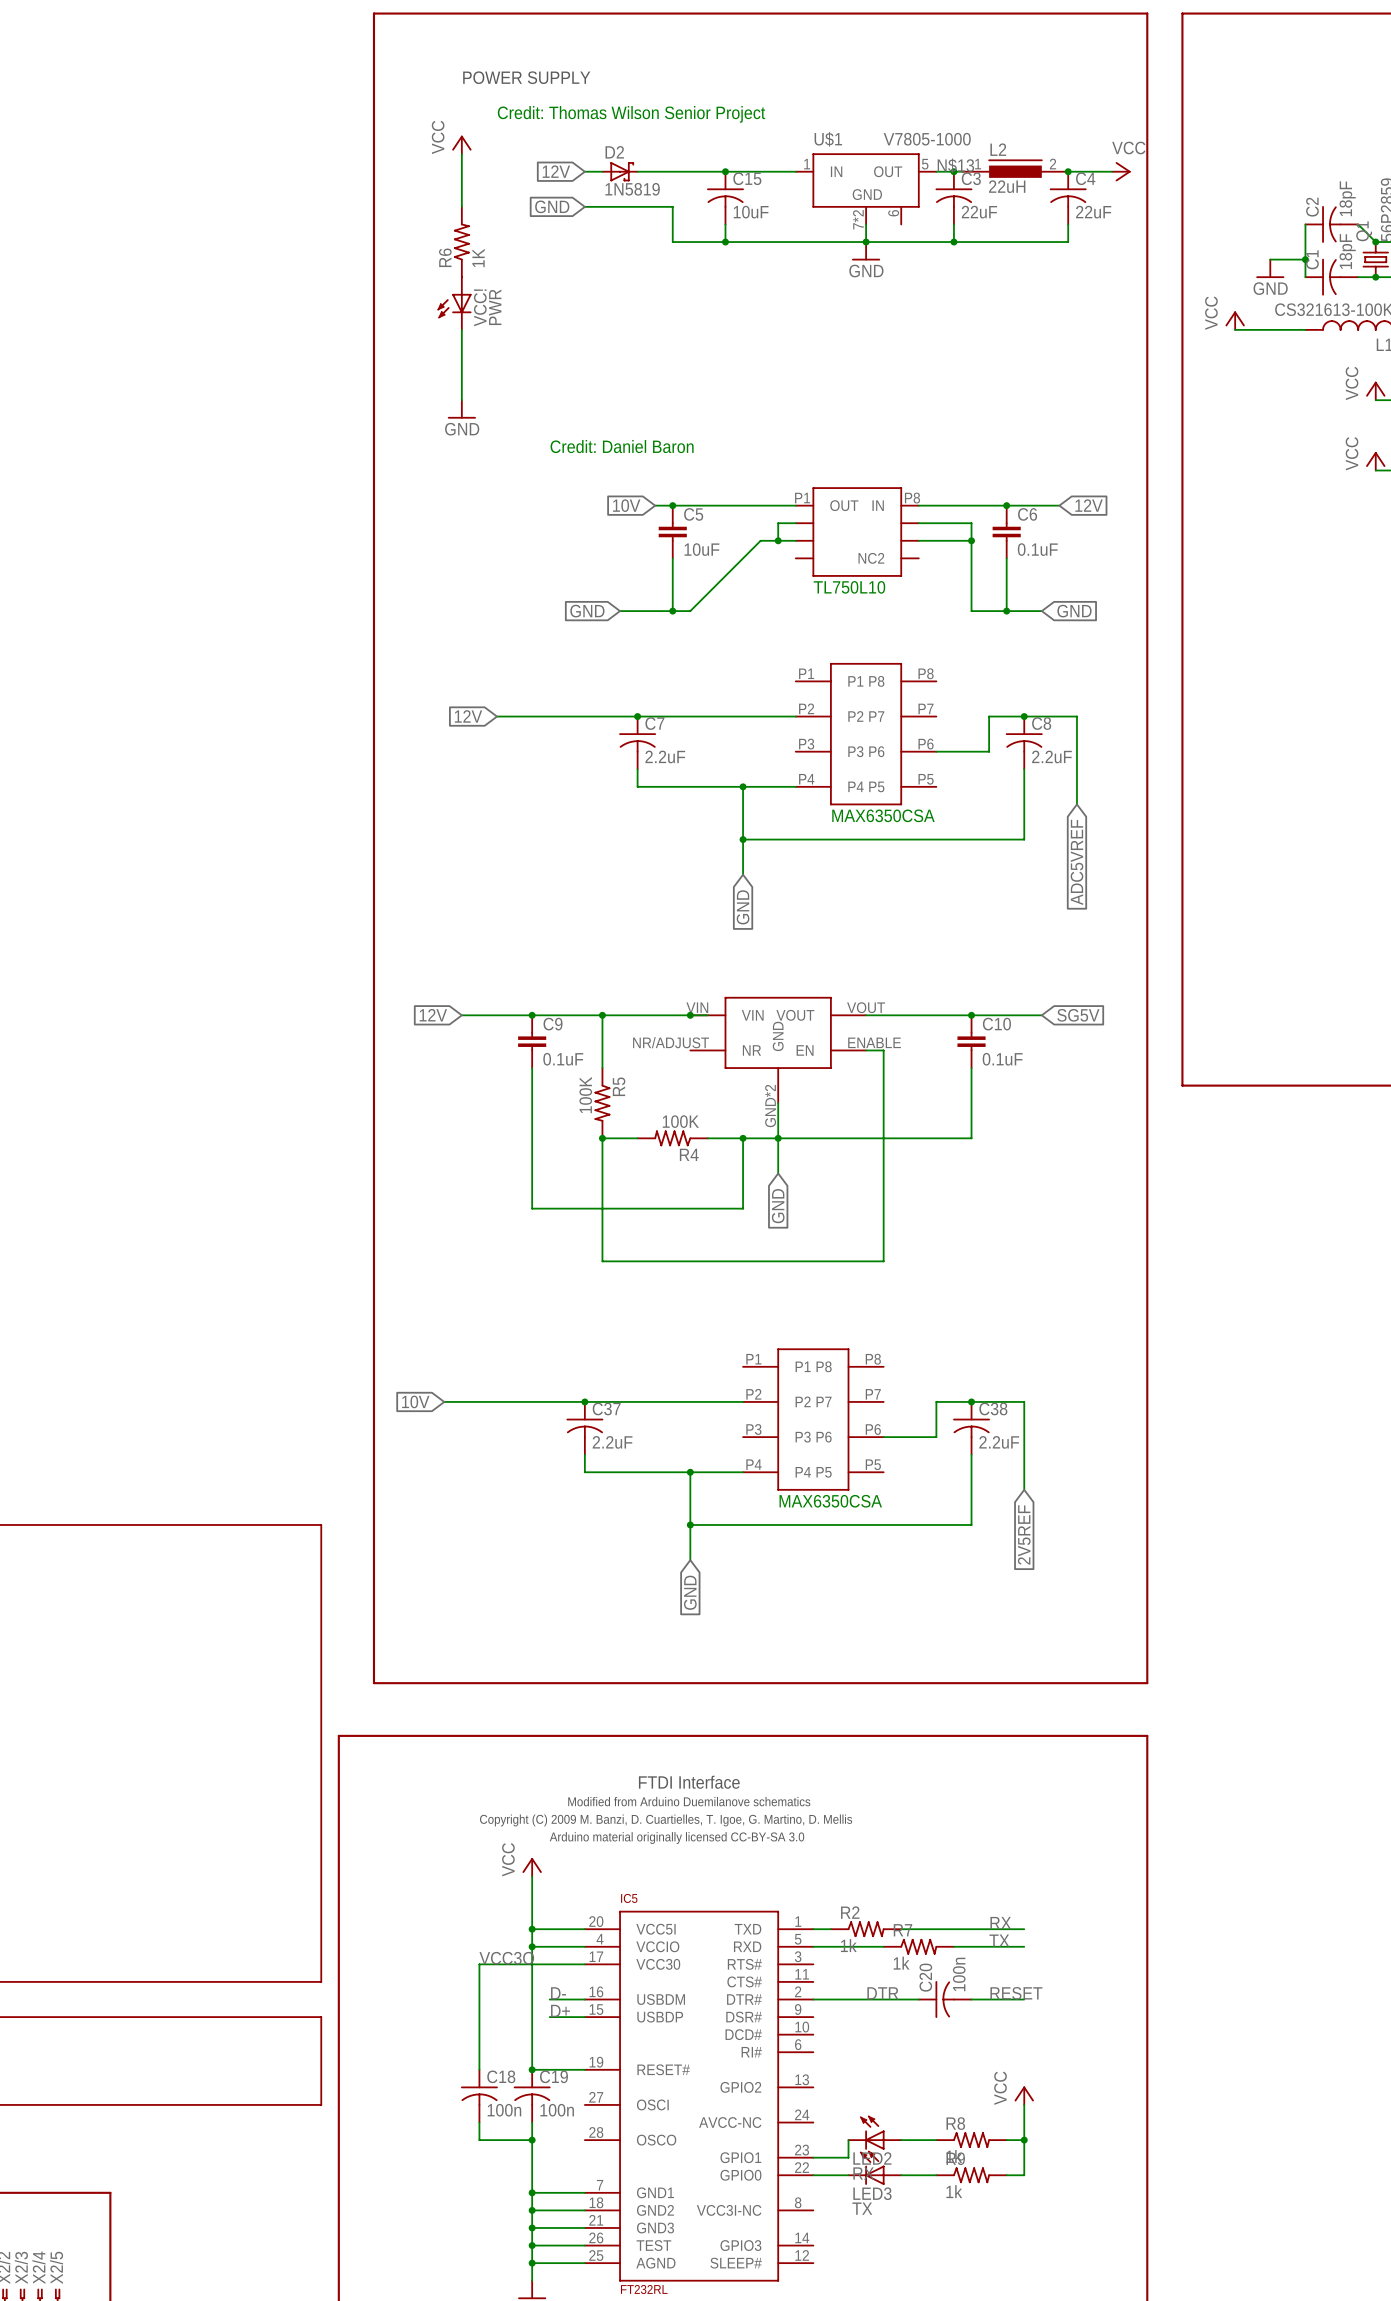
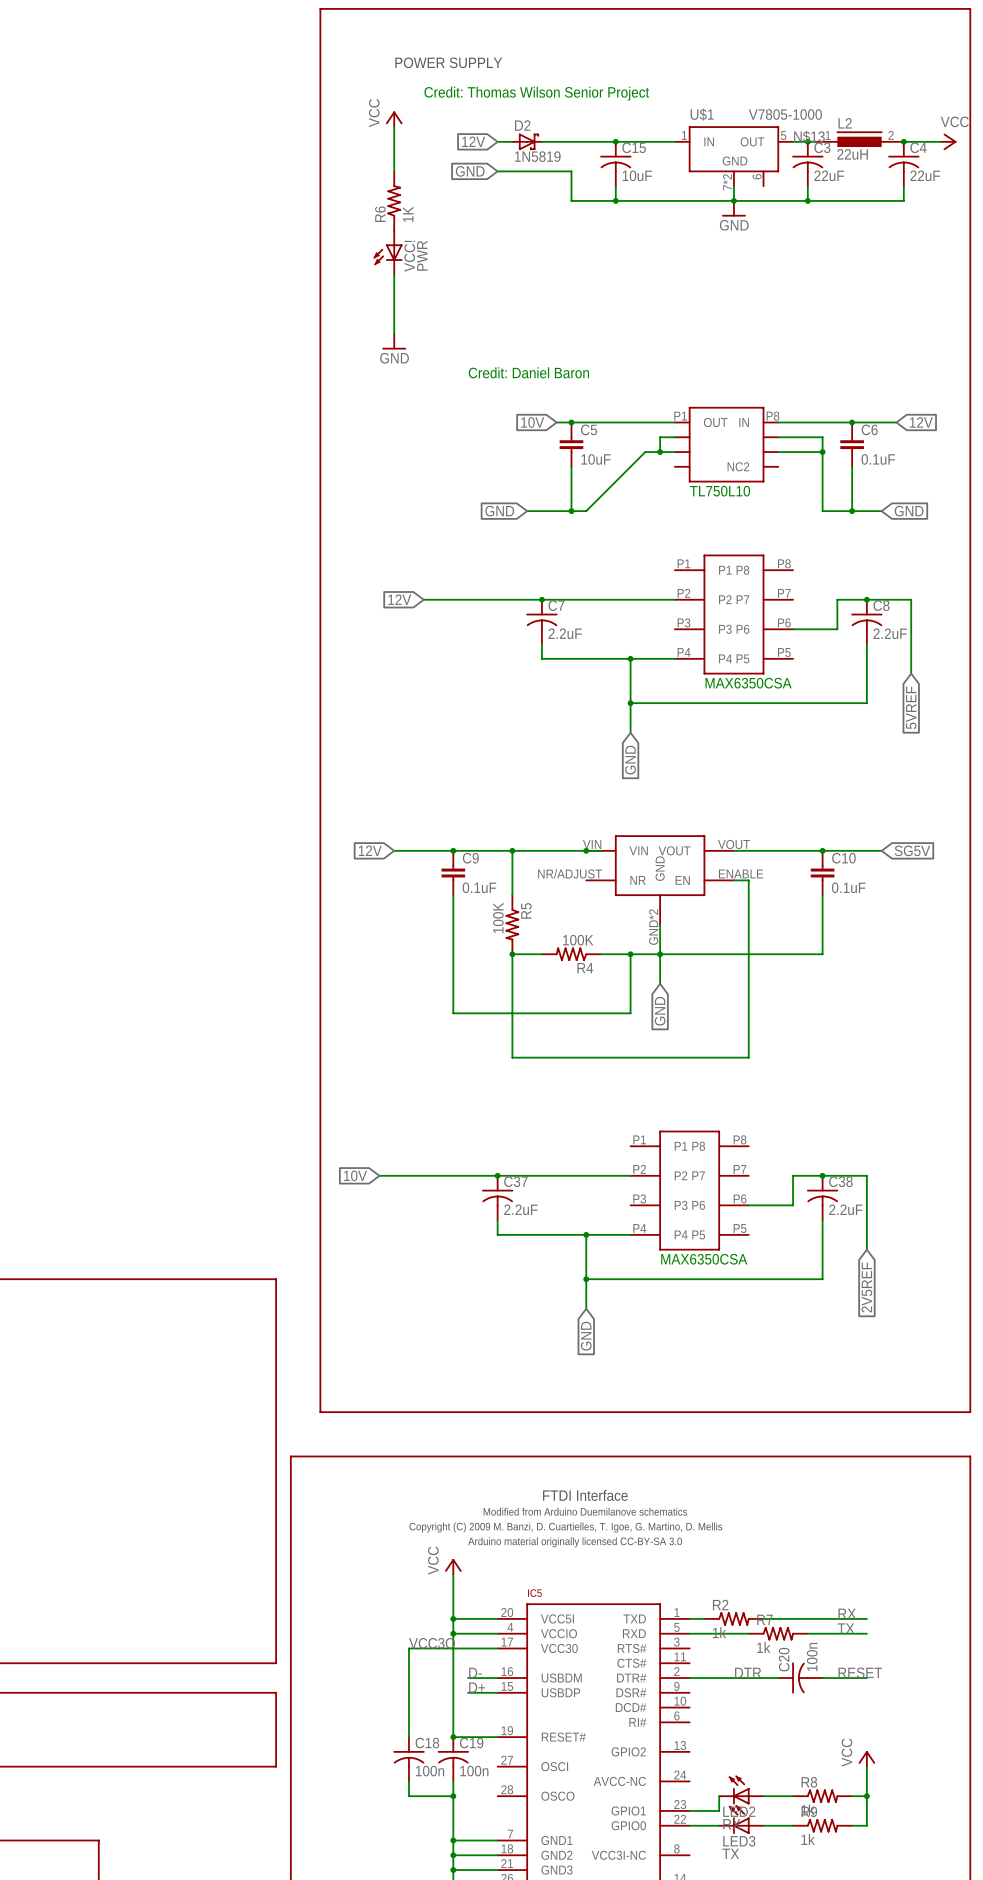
global label: ADC5VREF (1076, 862) -> 5VREF (911, 707)

